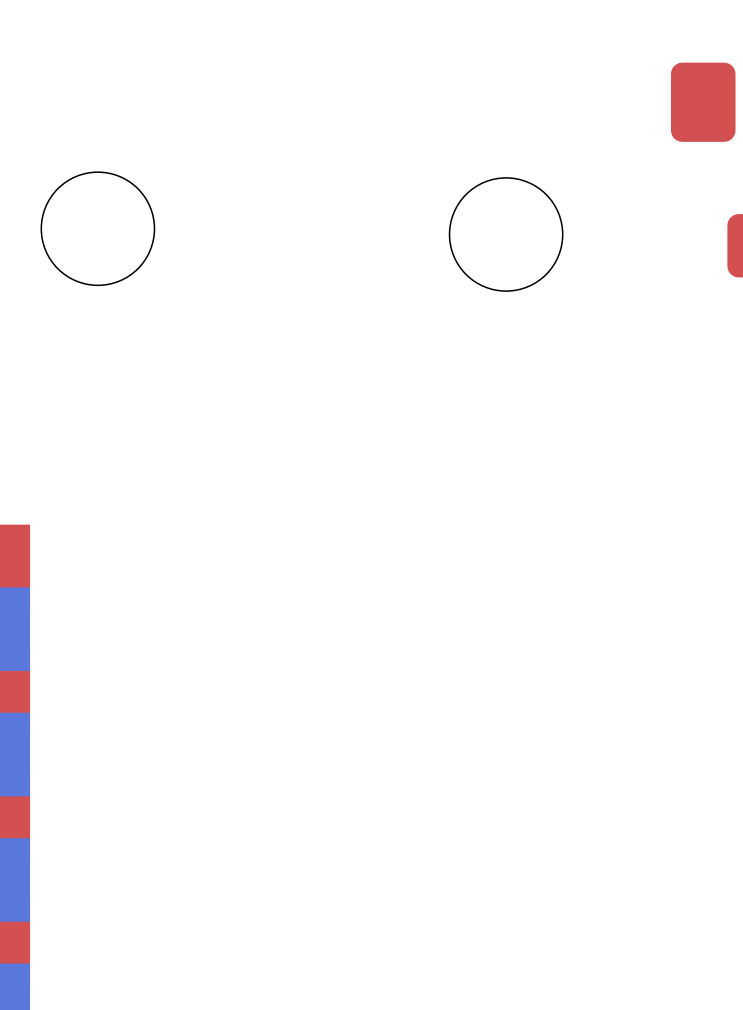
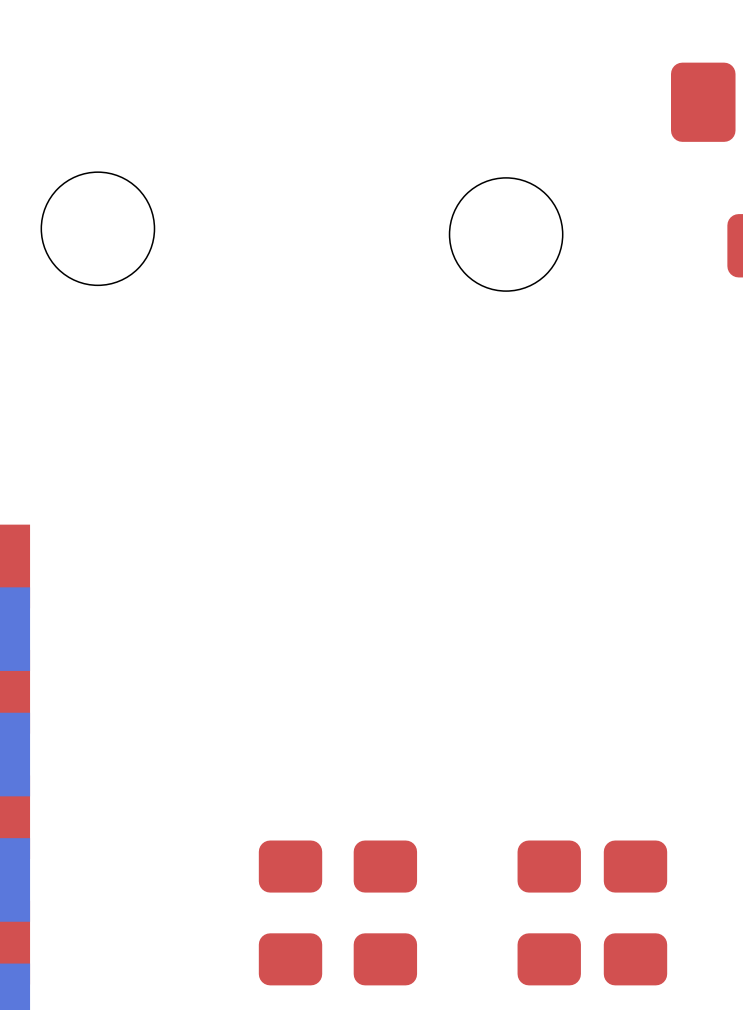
part: none -> (290, 912)
part: none -> (385, 912)
part: none -> (549, 912)
part: none -> (635, 912)

